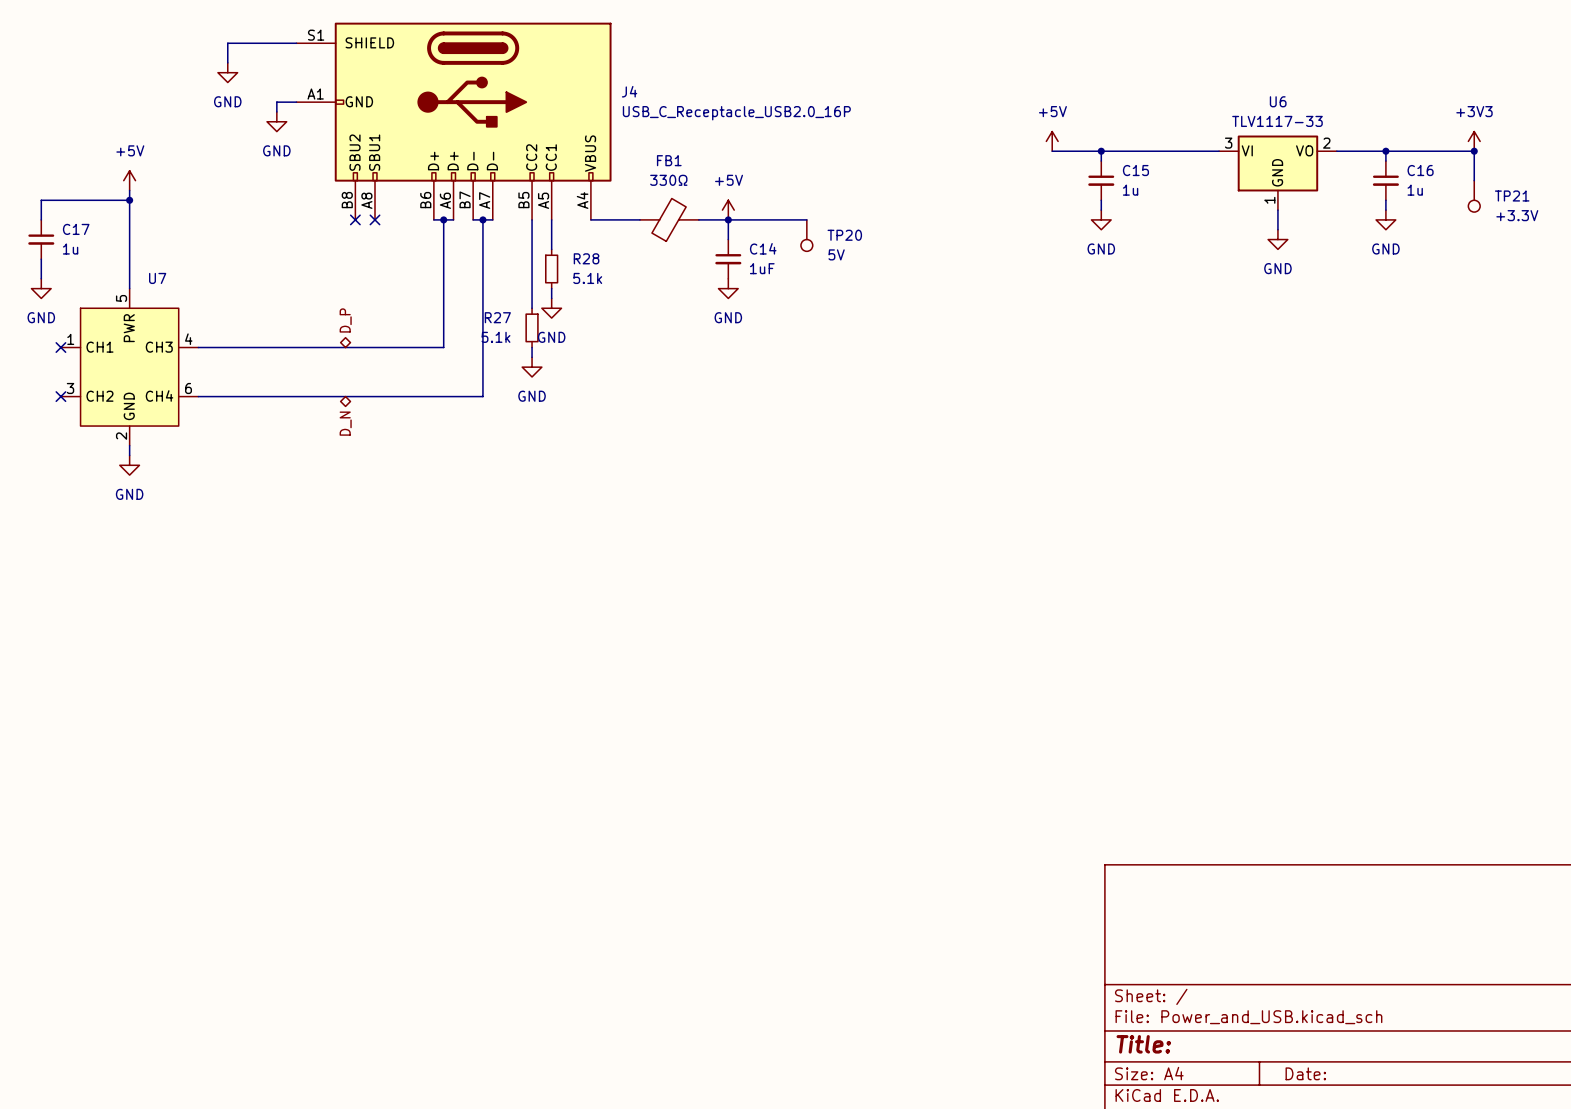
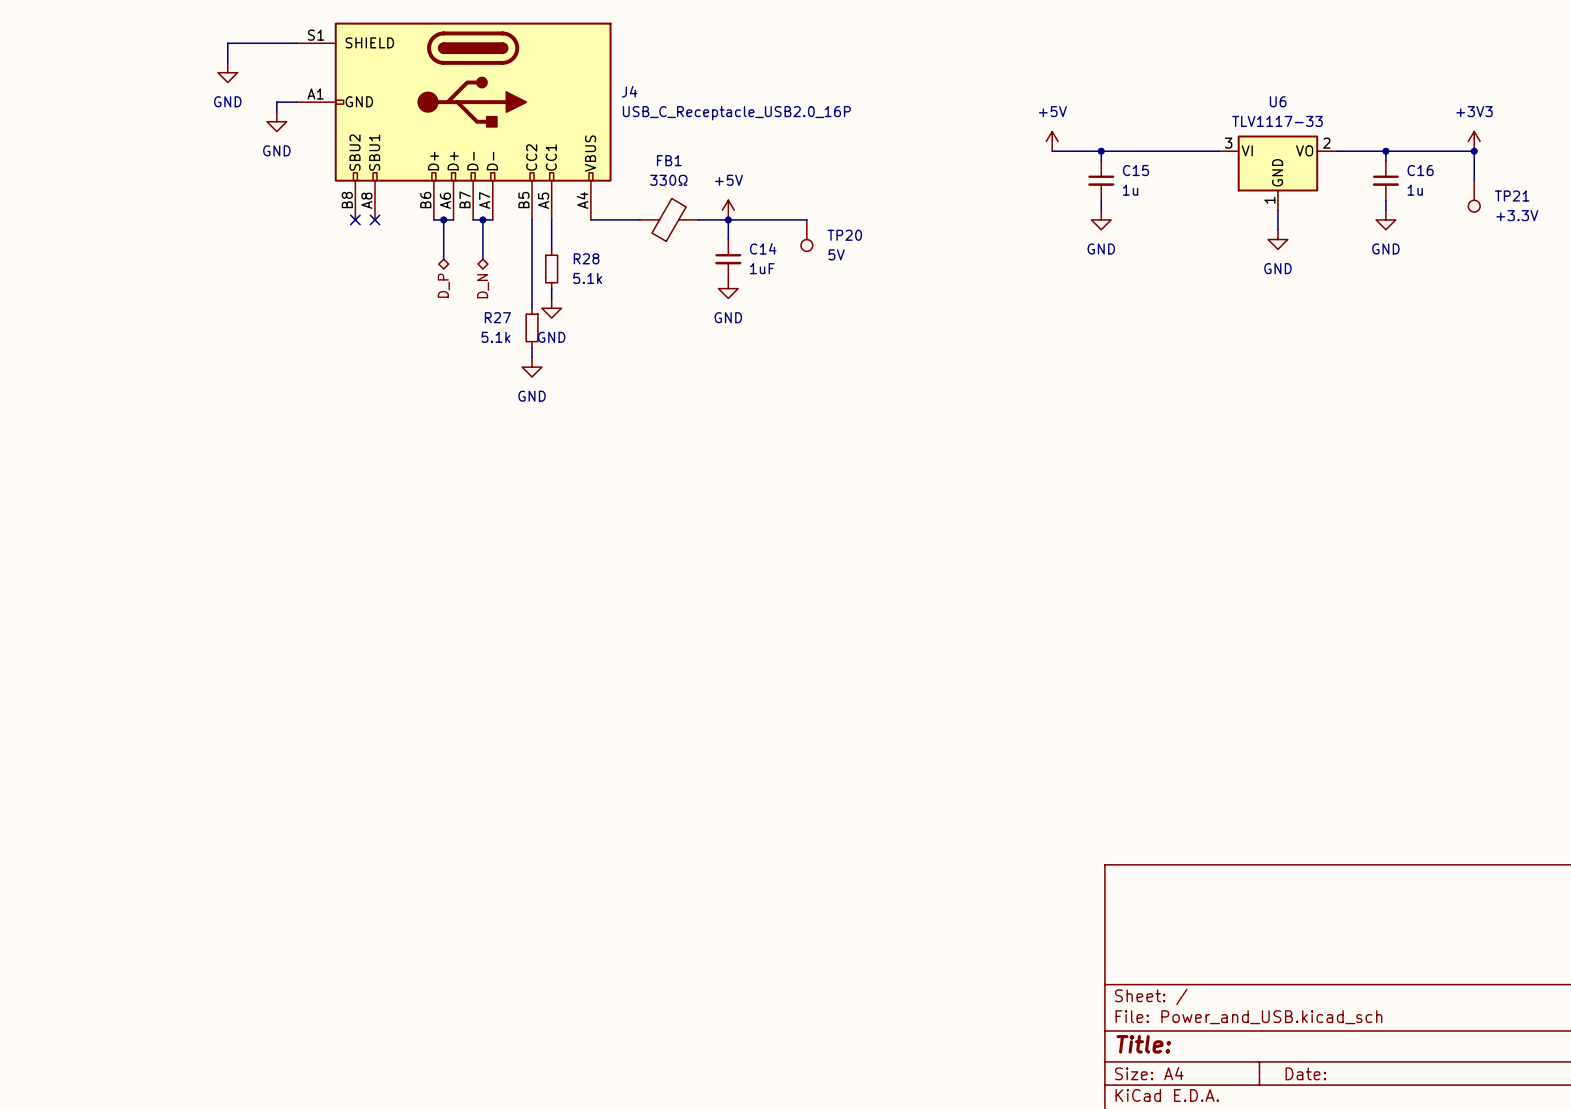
power symbol: +5V (129, 180) -> none
wire: (129, 190) (129, 288) -> none
wire: (129, 200) (41, 200) (41, 219) -> none
junction: (129, 200) -> none
C17: 1u (41, 239) -> none
wire: (41, 259) (41, 278) -> none
wire: (443, 259) (443, 347) (198, 347) -> none
wire: (482, 259) (482, 396) (198, 396) -> none
hierarchical label: none -> D_N (483, 286)
power symbol: GND (41, 288) -> none
hierarchical label rotation: 0° (345, 320) -> 180° (443, 285)
hierarchical label position: D_P (345, 320) -> D_P (443, 285)
no-connect mark: (60, 347) -> none
U7: (129, 367) -> none
no-connect mark: (60, 396) -> none
hierarchical label: D_N (345, 423) -> none
wire: (129, 445) (129, 455) -> none
power symbol: GND (129, 465) -> none

